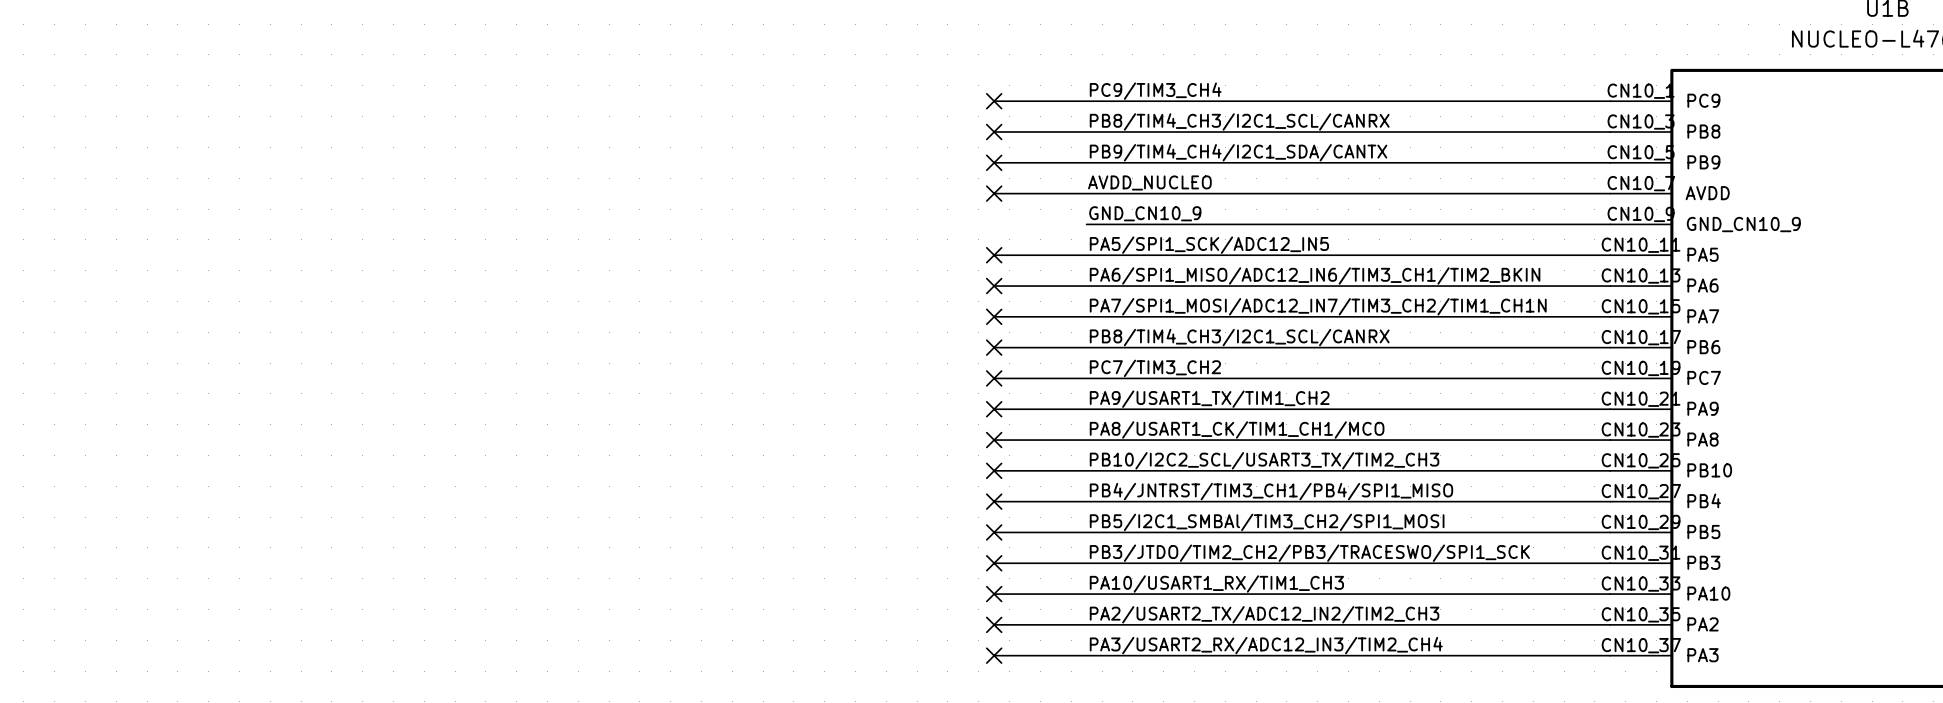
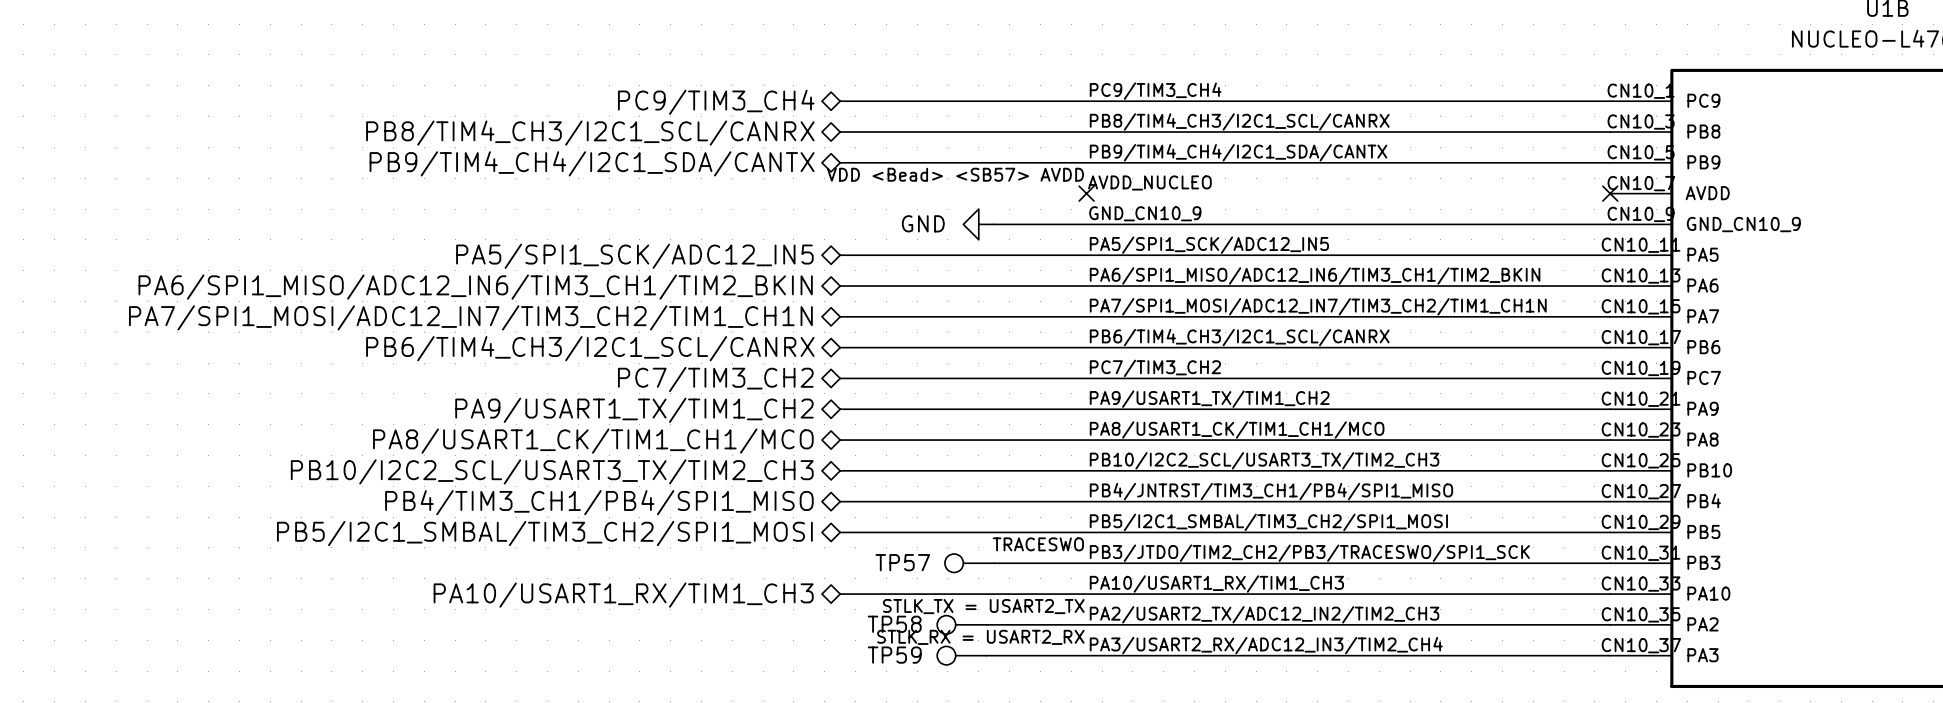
wire: none -> (840, 101) (994, 101)
no-connect mark: (994, 101) -> none
hierarchical label: none -> PC9/TIM3_CH4 (716, 102)
wire: none -> (840, 132) (994, 132)
no-connect mark: (994, 132) -> none
hierarchical label: none -> PB8/TIM4_CH3/I2C1_SCL/CANRX (590, 133)
wire: none -> (840, 162) (994, 162)
no-connect mark: (994, 162) -> none
hierarchical label: none -> PB9/TIM4_CH4/I2C1_SDA/CANTX (592, 163)
text: none -> VDD <Bead> <SB57> AVDD (955, 174)
wire: (994, 193) (1610, 193) -> none
no-connect mark: (994, 193) -> none
no-connect mark: none -> (1086, 193)
no-connect mark: none -> (1610, 193)
power symbol: none -> GND (978, 224)
wire: none -> (994, 224) (1086, 224)
wire: none -> (840, 255) (994, 255)
no-connect mark: (994, 255) -> none
hierarchical label: none -> PA5/SPI1_SCK/ADC12_IN5 (634, 256)
wire: none -> (840, 286) (994, 286)
no-connect mark: (994, 286) -> none
hierarchical label: none -> PA6/SPI1_MISO/ADC12_IN6/TIM3_CH1/TIM2_BKIN (475, 287)
wire: none -> (840, 316) (994, 316)
no-connect mark: (994, 316) -> none
hierarchical label: none -> PA7/SPI1_MOSI/ADC12_IN7/TIM3_CH2/TIM1_CH1N (470, 317)
label: PB8/TIM4_CH3/I2C1_SCL/CANRX (1239, 337) -> PB6/TIM4_CH3/I2C1_SCL/CANRX (1239, 337)
wire: none -> (840, 347) (994, 347)
no-connect mark: (994, 347) -> none
hierarchical label: none -> PB6/TIM4_CH3/I2C1_SCL/CANRX (590, 348)
wire: none -> (840, 378) (994, 378)
no-connect mark: (994, 378) -> none
hierarchical label: none -> PC7/TIM3_CH2 (715, 379)
wire: none -> (840, 409) (994, 409)
no-connect mark: (994, 409) -> none
hierarchical label: none -> PA9/USART1_TX/TIM1_CH2 (634, 410)
wire: none -> (840, 440) (994, 440)
no-connect mark: (994, 440) -> none
hierarchical label: none -> PA8/USART1_CK/TIM1_CH1/MCO (593, 441)
wire: none -> (840, 470) (994, 470)
no-connect mark: (994, 470) -> none
hierarchical label: none -> PB10/I2C2_SCL/USART3_TX/TIM2_CH3 (552, 471)
wire: none -> (840, 501) (994, 501)
no-connect mark: (994, 501) -> none
hierarchical label: none -> PB4/TIM3_CH1/PB4/SPI1_MISO (599, 502)
label: PB5/I2C1_SMBAl/TIM3_CH2/SPI1_MOSI (1267, 522) -> PB5/I2C1_SMBAL/TIM3_CH2/SPI1_MOSI (1268, 522)
wire: none -> (840, 532) (994, 532)
no-connect mark: (994, 532) -> none
hierarchical label: none -> PB5/I2C1_SMBAL/TIM3_CH2/SPI1_MOSI (544, 533)
text: none -> TRACESWO (1038, 544)
TP57: none -> (969, 563)
no-connect mark: (994, 563) -> none
wire: none -> (840, 594) (994, 594)
no-connect mark: (994, 594) -> none
hierarchical label: none -> PA10/USART1_RX/TIM1_CH3 (623, 595)
text: none -> STLK_TX = USART2_TX (983, 606)
TP58: none -> (961, 624)
wire: none -> (986, 624) (994, 624)
no-connect mark: (994, 624) -> none
text: none -> STLK_RX = USART2_RX (980, 637)
TP59: none -> (961, 655)
wire: none -> (986, 655) (994, 655)
no-connect mark: (994, 655) -> none

